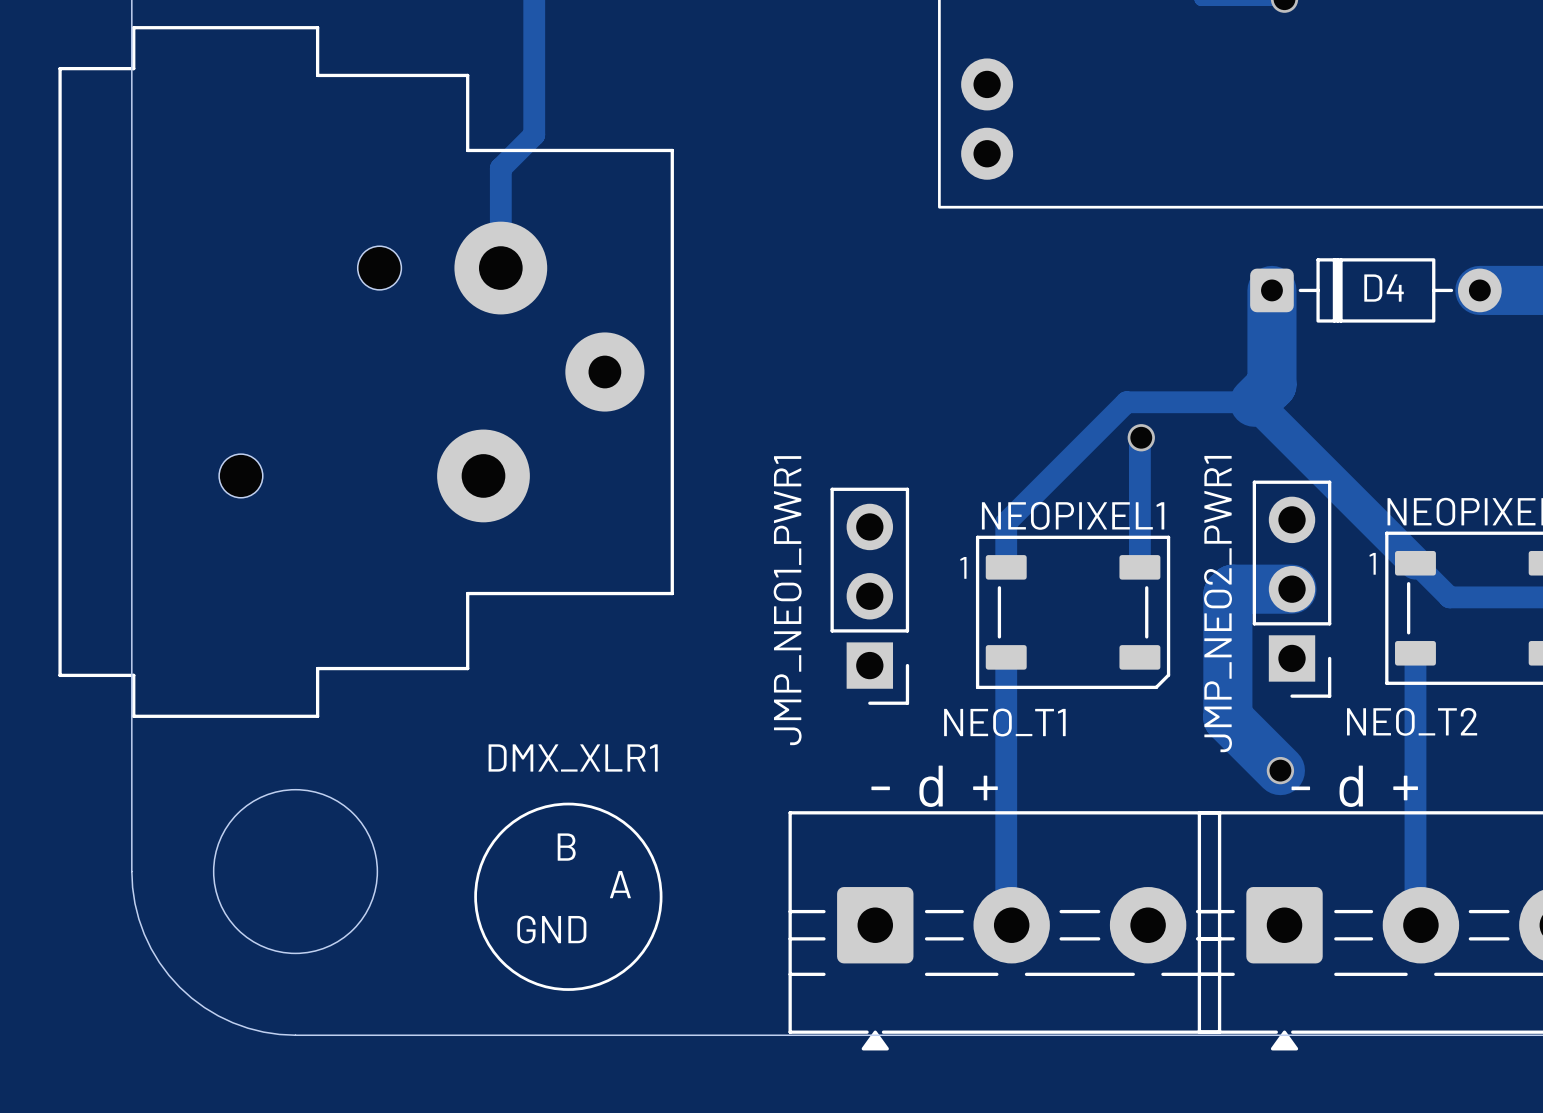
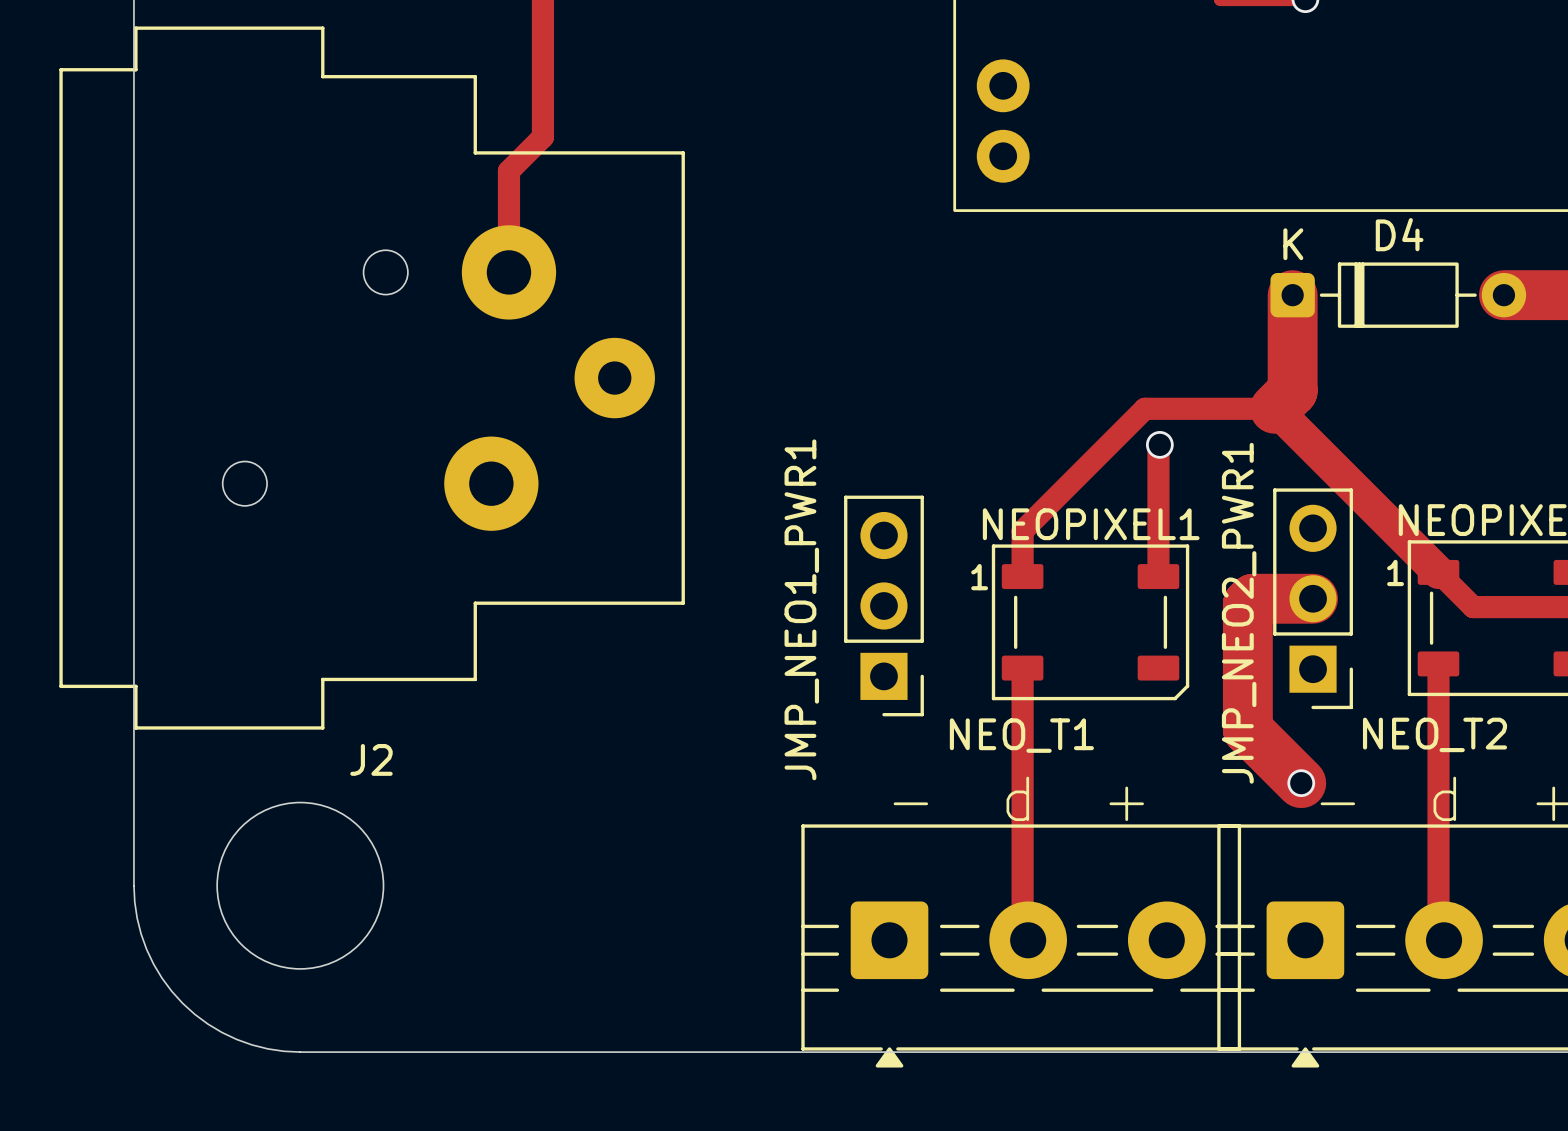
D4 text: none -> K (1293, 244)
D4 name position: D4 (1384, 288) -> D4 (1399, 234)
DMX_XLR1 name: DMX_XLR1 (573, 757) -> J2 (371, 759)
drawing: [474, 802, 663, 991] -> none
text: B (566, 847) -> none
text: A (620, 884) -> none
text: GND (551, 929) -> none

